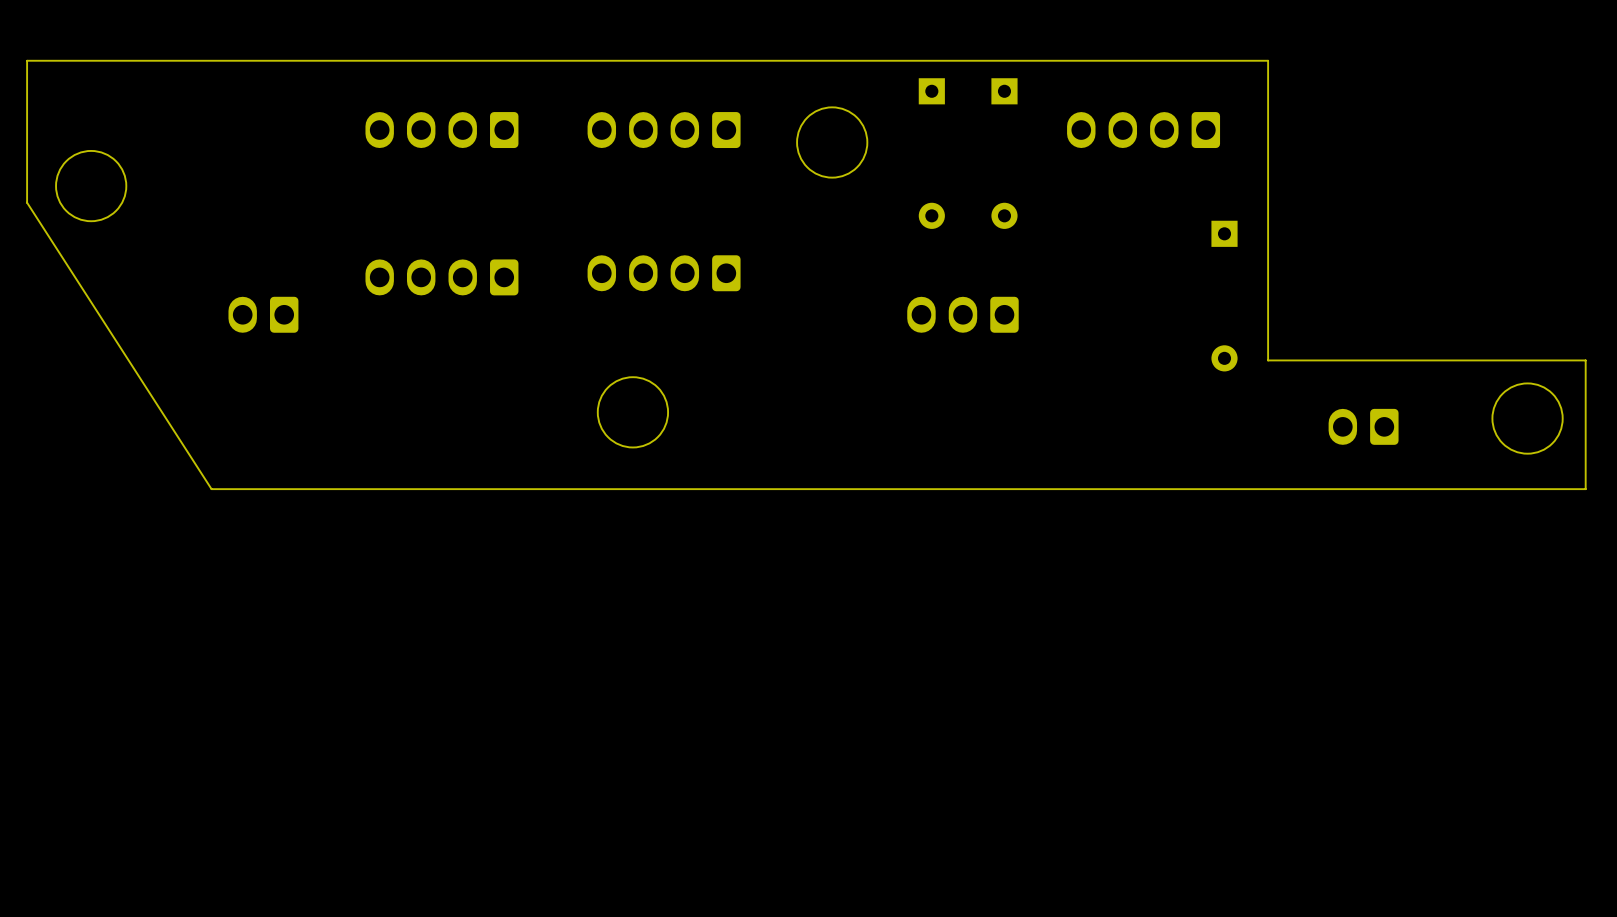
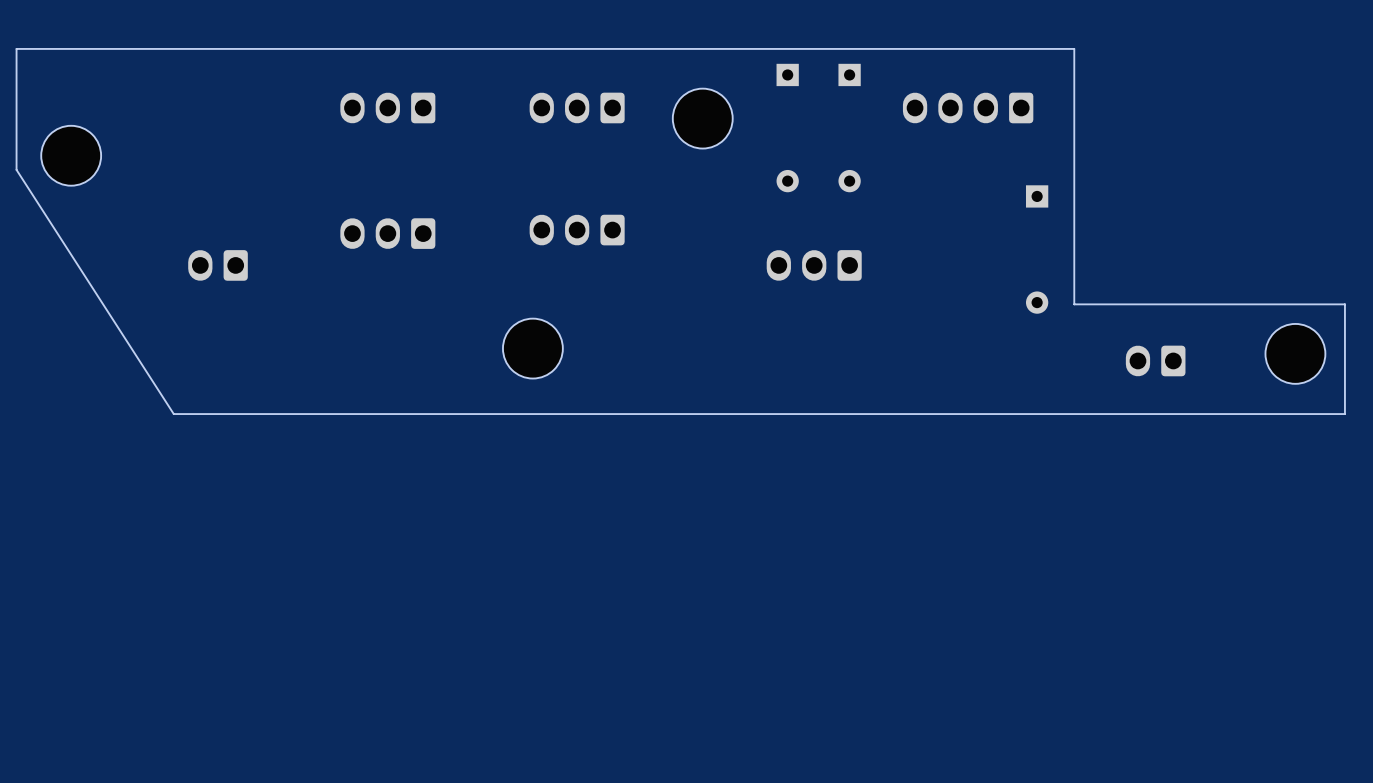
part: (441, 130) -> none
part: (664, 130) -> none
part: (664, 273) -> none
part: (441, 277) -> none

